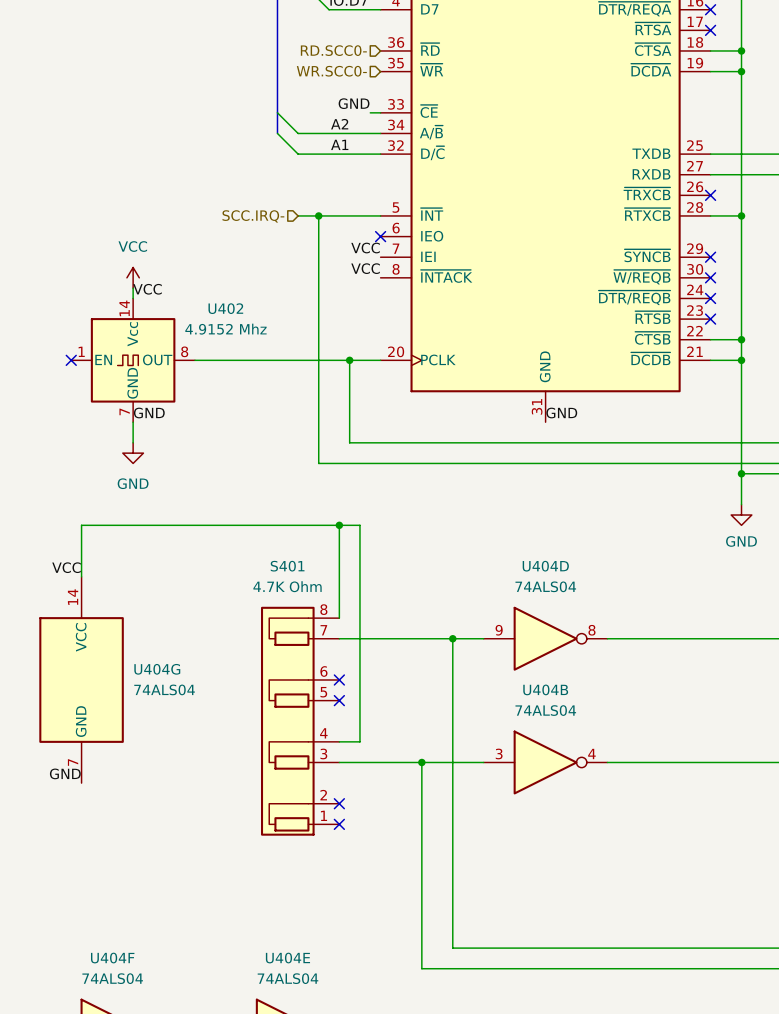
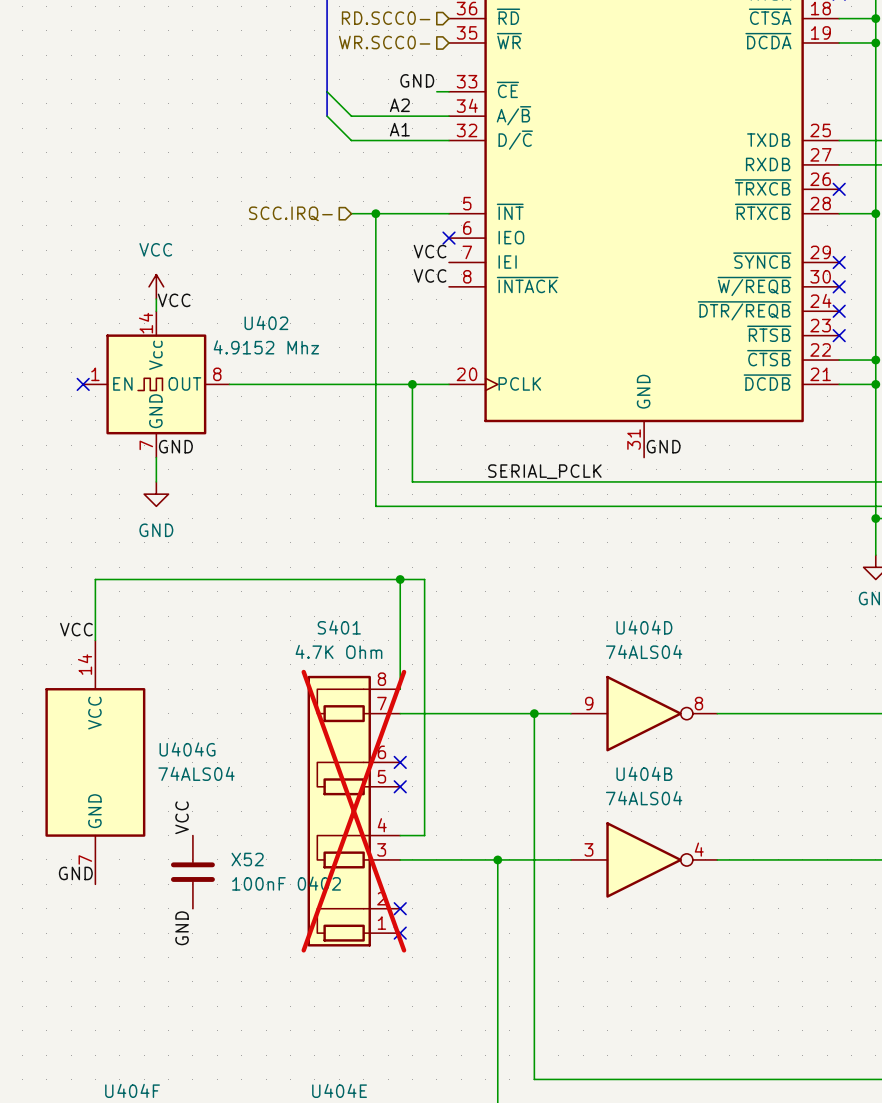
label: none -> SERIAL_PCLK (544, 471)
S401 do-not-place cross: none -> (353, 811)
label: none -> VCC (182, 817)
X52: none -> 100nF 0402 (192, 872)
label: none -> GND (182, 928)

